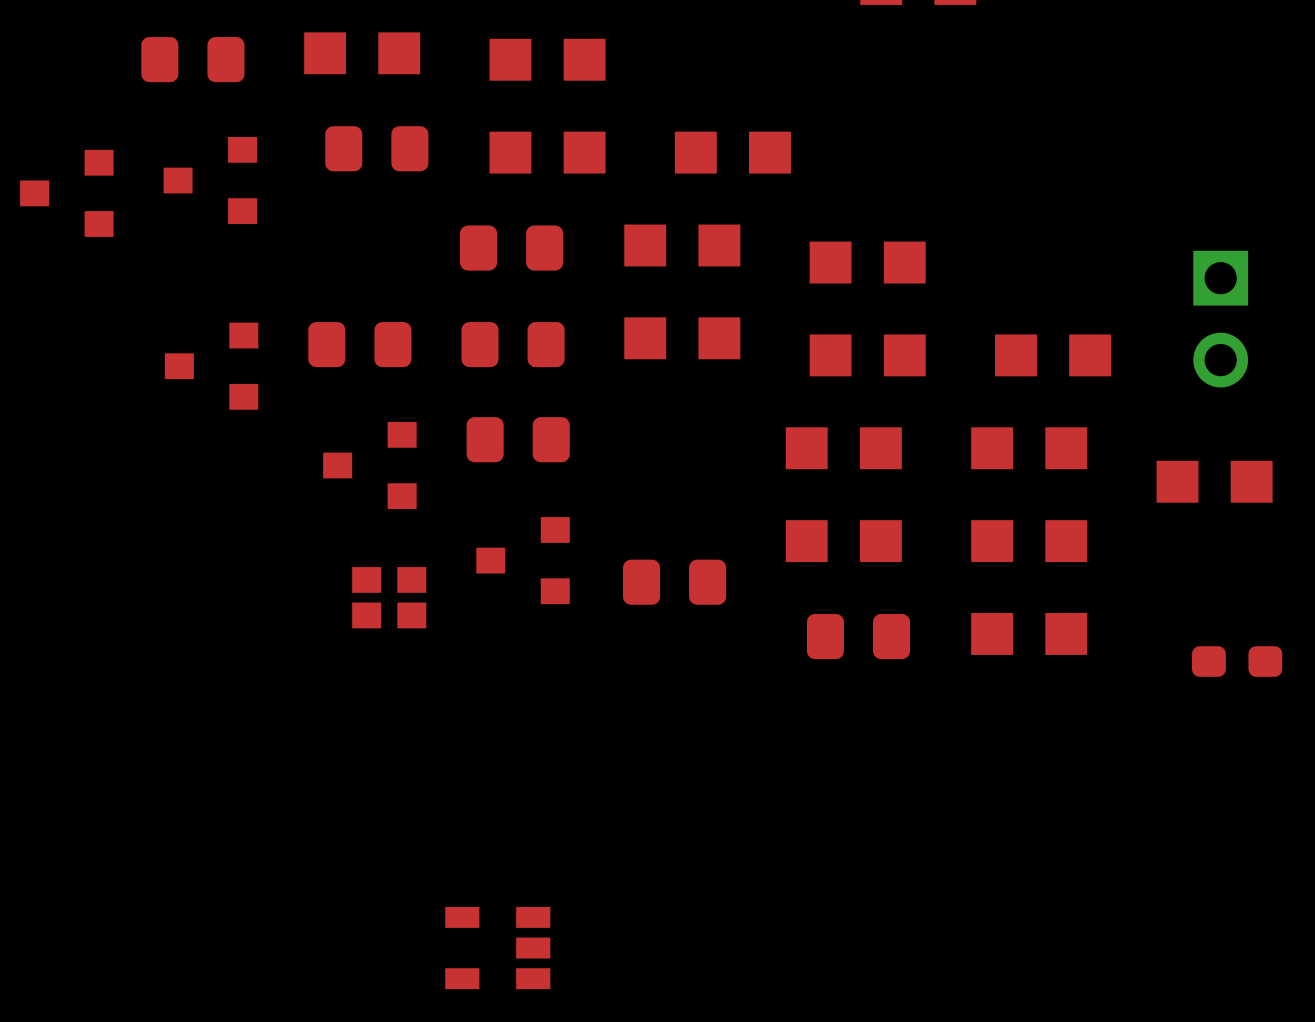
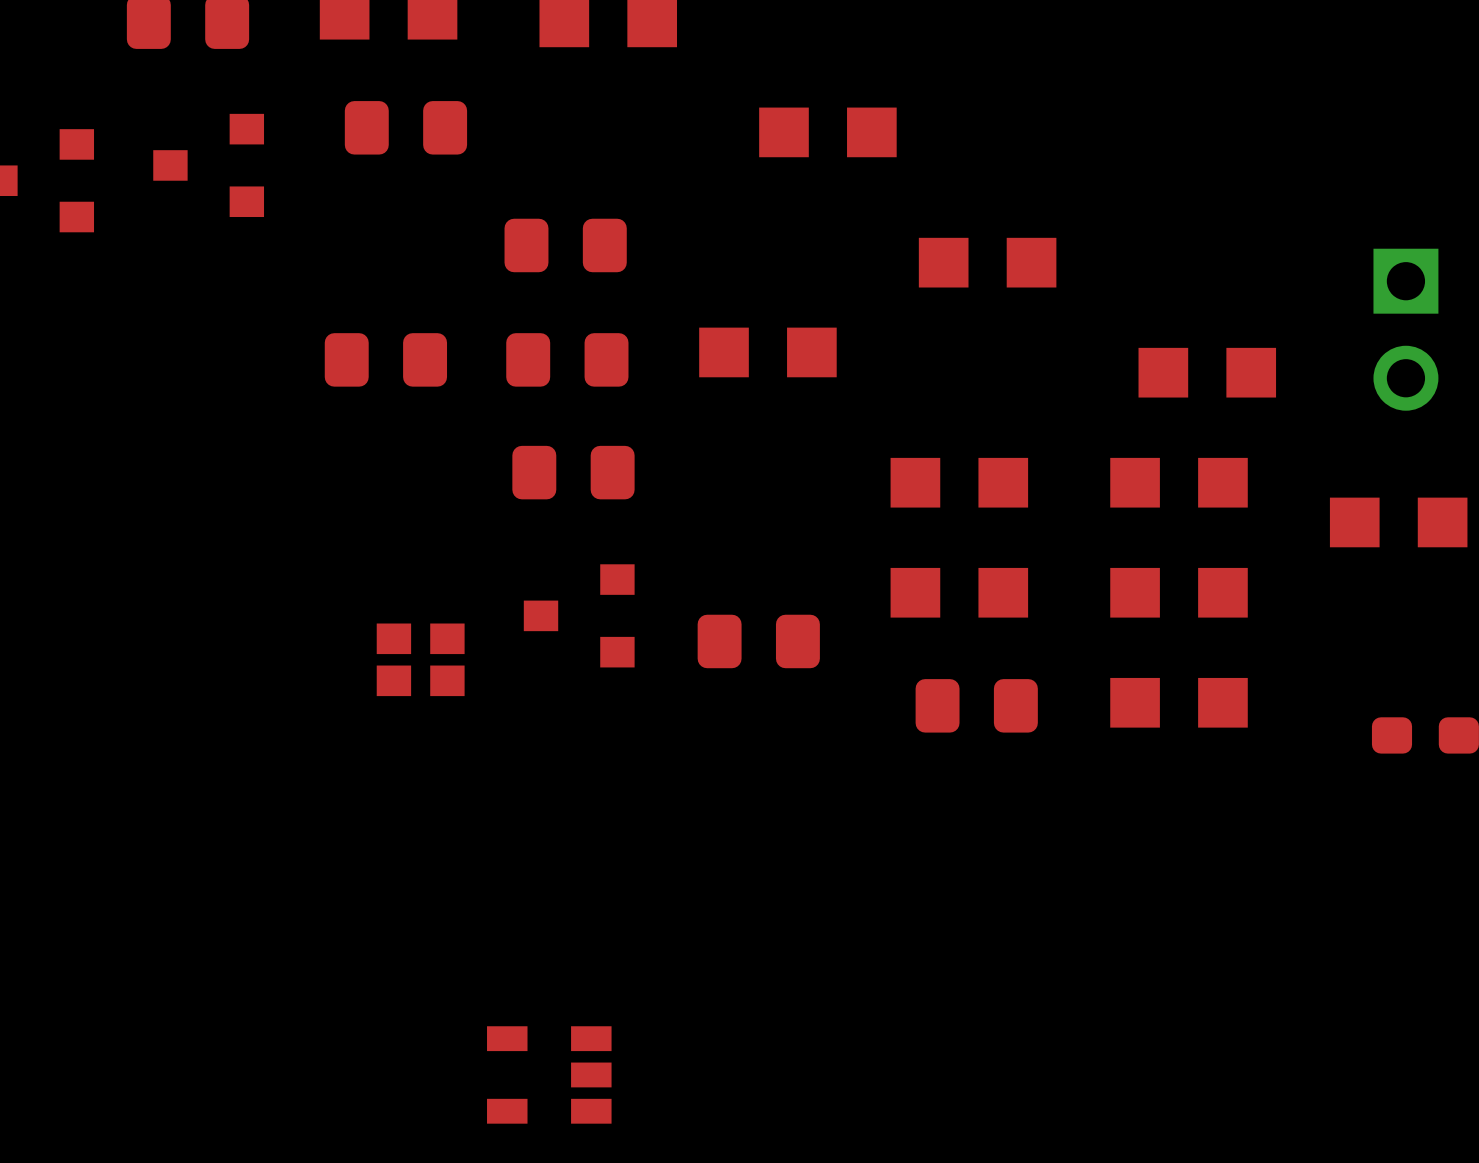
part: (547, 152) -> none
part: (682, 245) -> none
part: (867, 355) -> none
part: (211, 366) -> none
part: (369, 465) -> none

